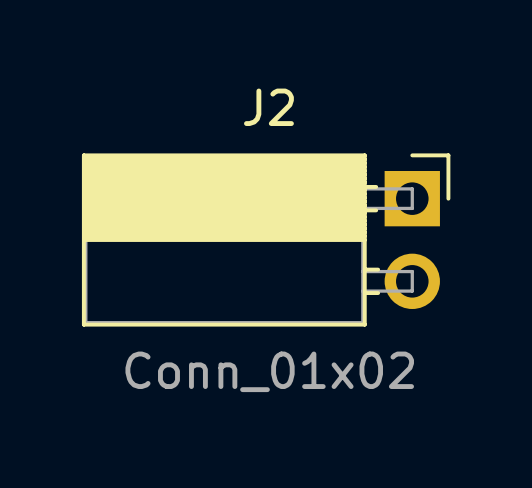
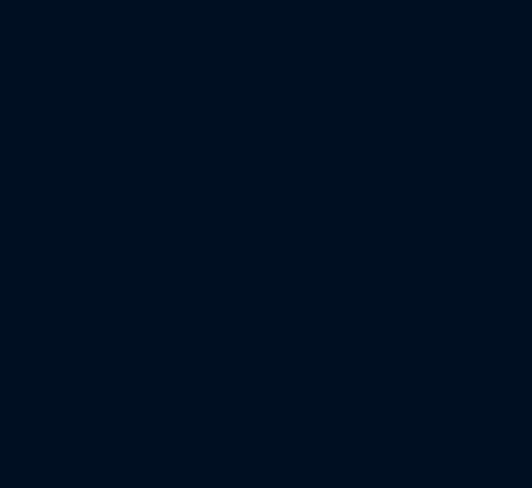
J2: Conn_01x02 (266, 239) -> none

